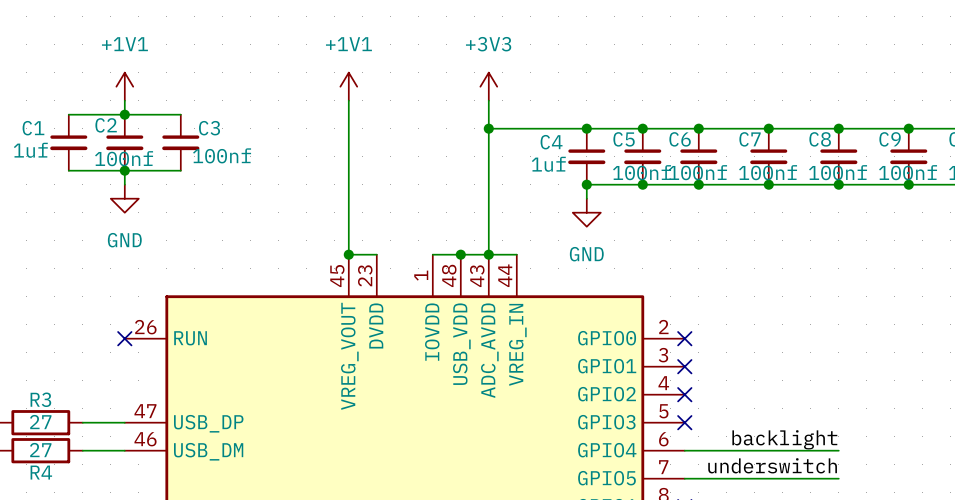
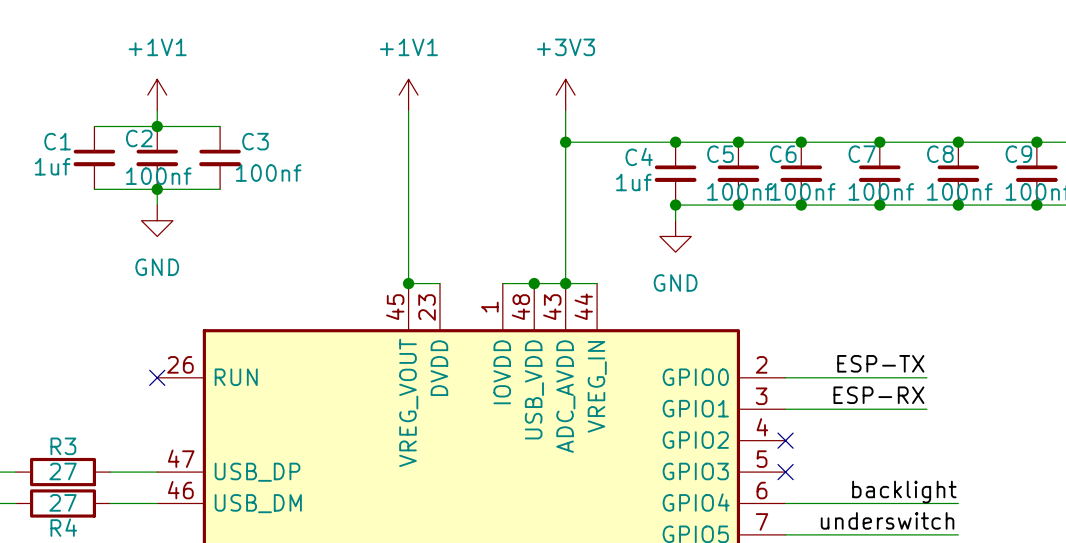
label: none -> ESP-TX (880, 363)
wire: none -> (785, 377) (926, 377)
no-connect mark: (684, 338) -> none
label: none -> ESP-RX (878, 395)
wire: none -> (785, 409) (926, 409)
no-connect mark: (684, 366) -> none

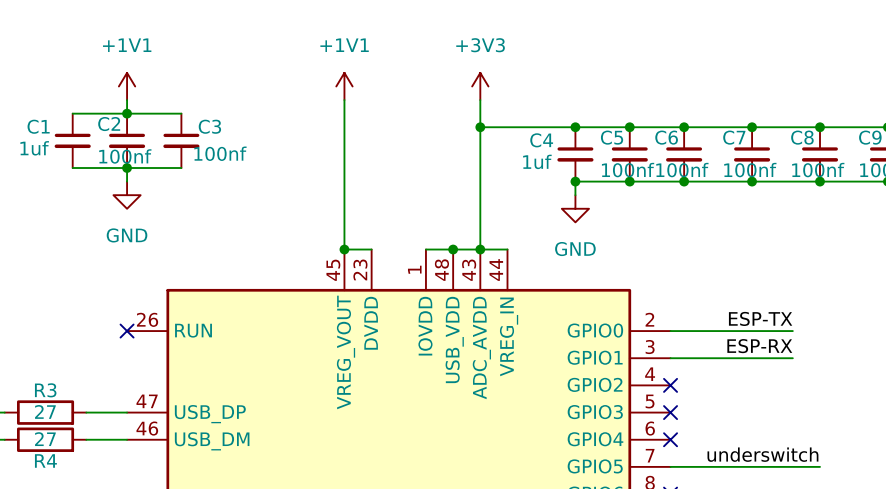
label: backlight (904, 492) -> none
wire: (785, 503) (958, 503) -> none
no-connect mark: none -> (670, 439)

